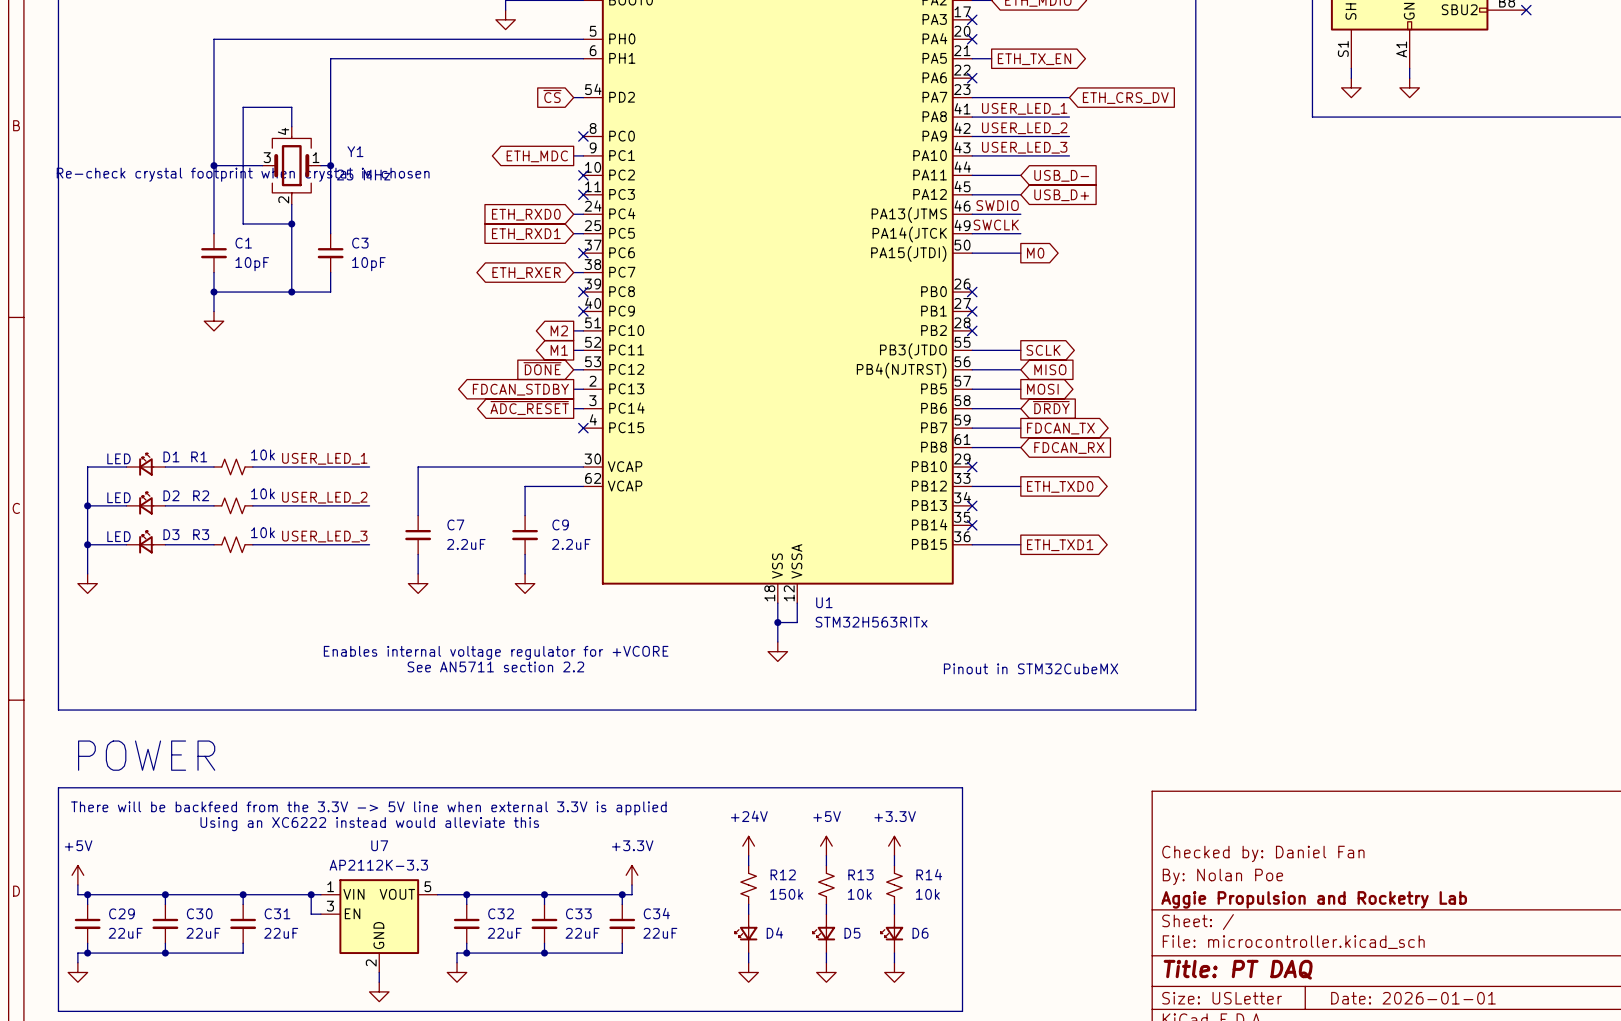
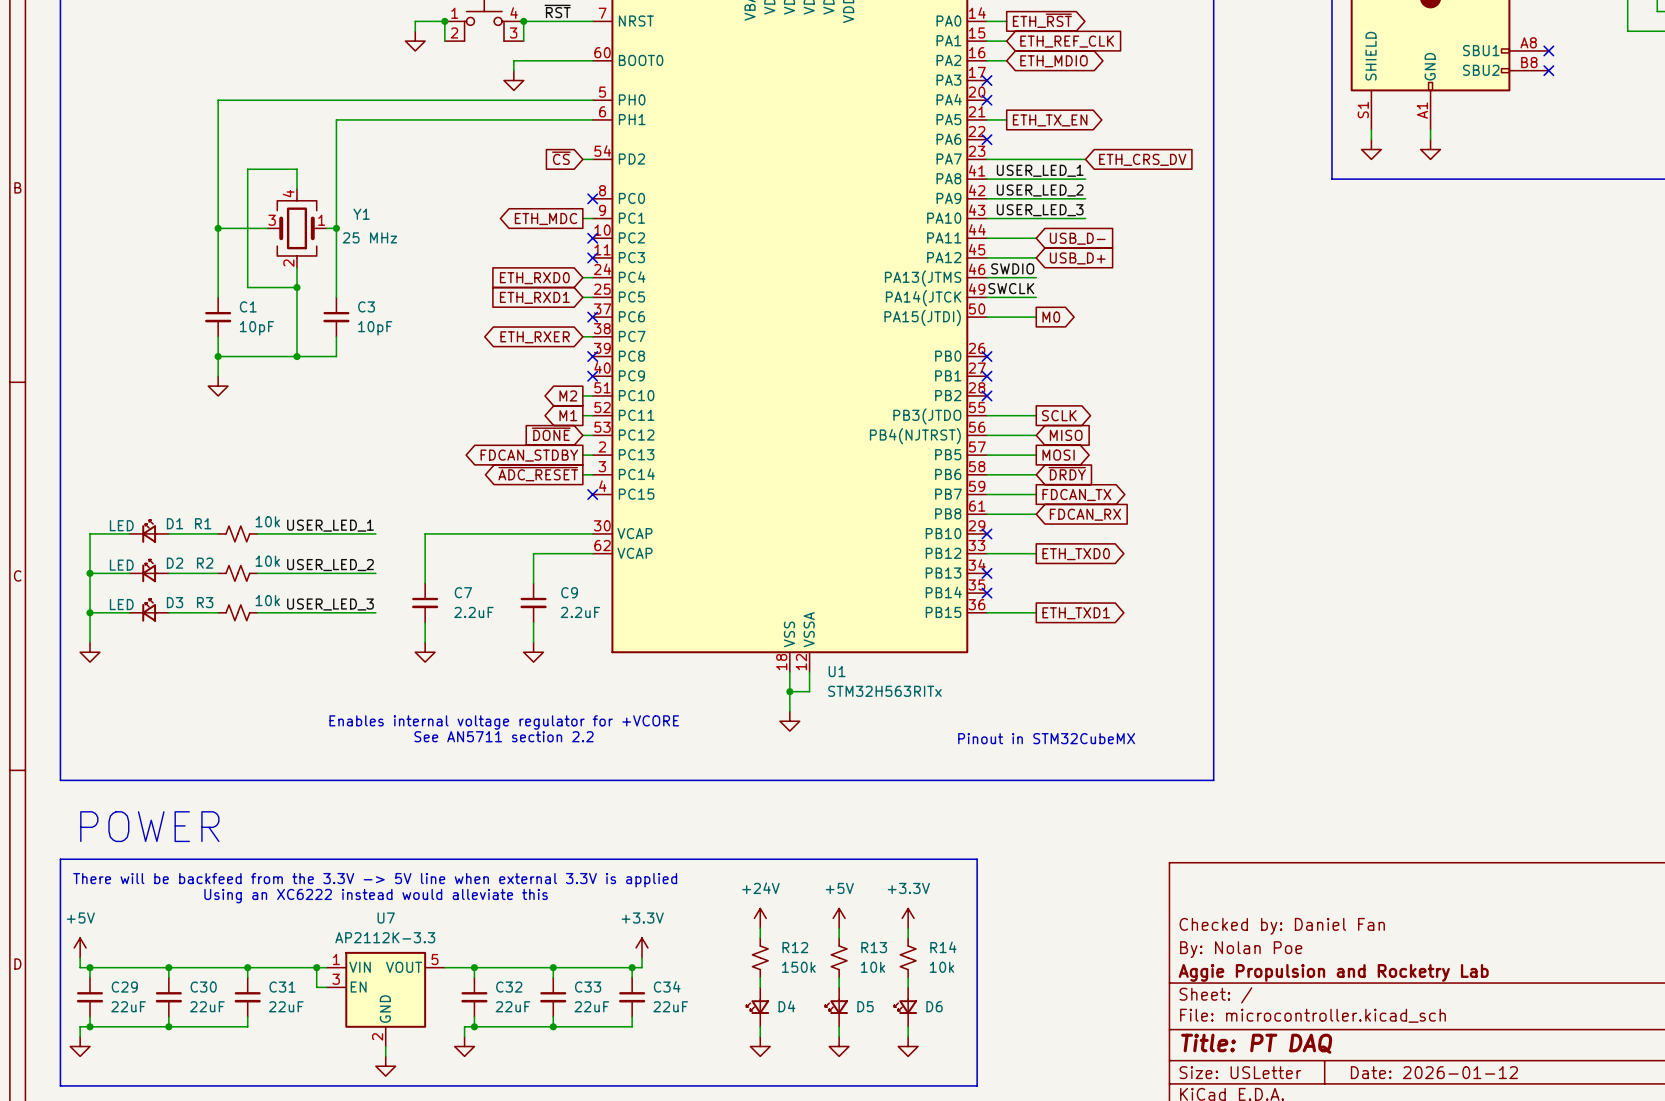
text: Re-check crystal footprint when crystal is chosen (243, 174) -> none
title block: Date: 2026-01-01 (1413, 998) -> Date: 2026-01-12 (1434, 1072)

